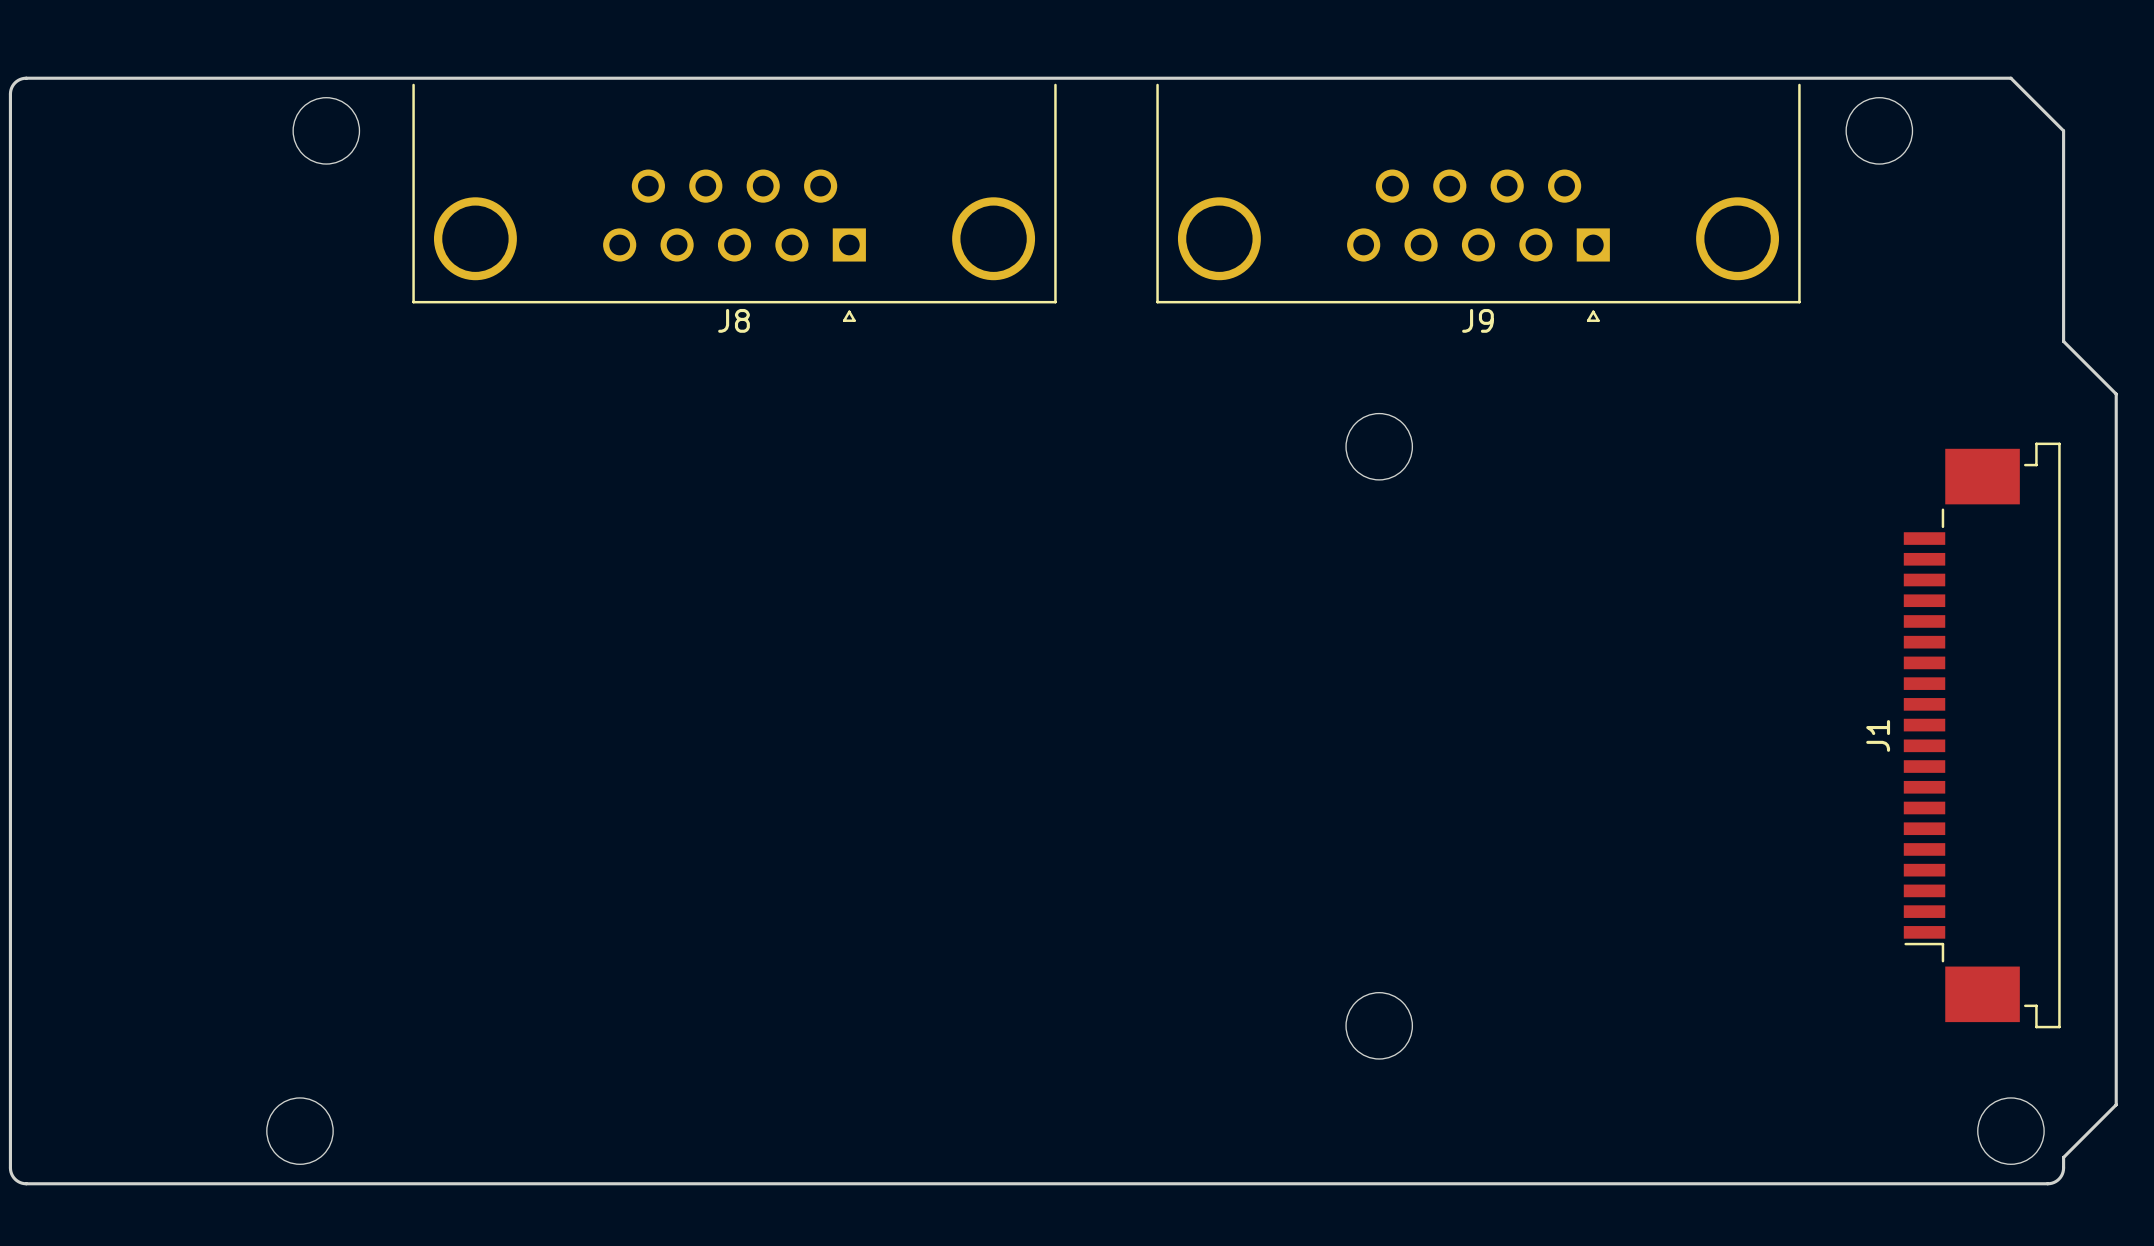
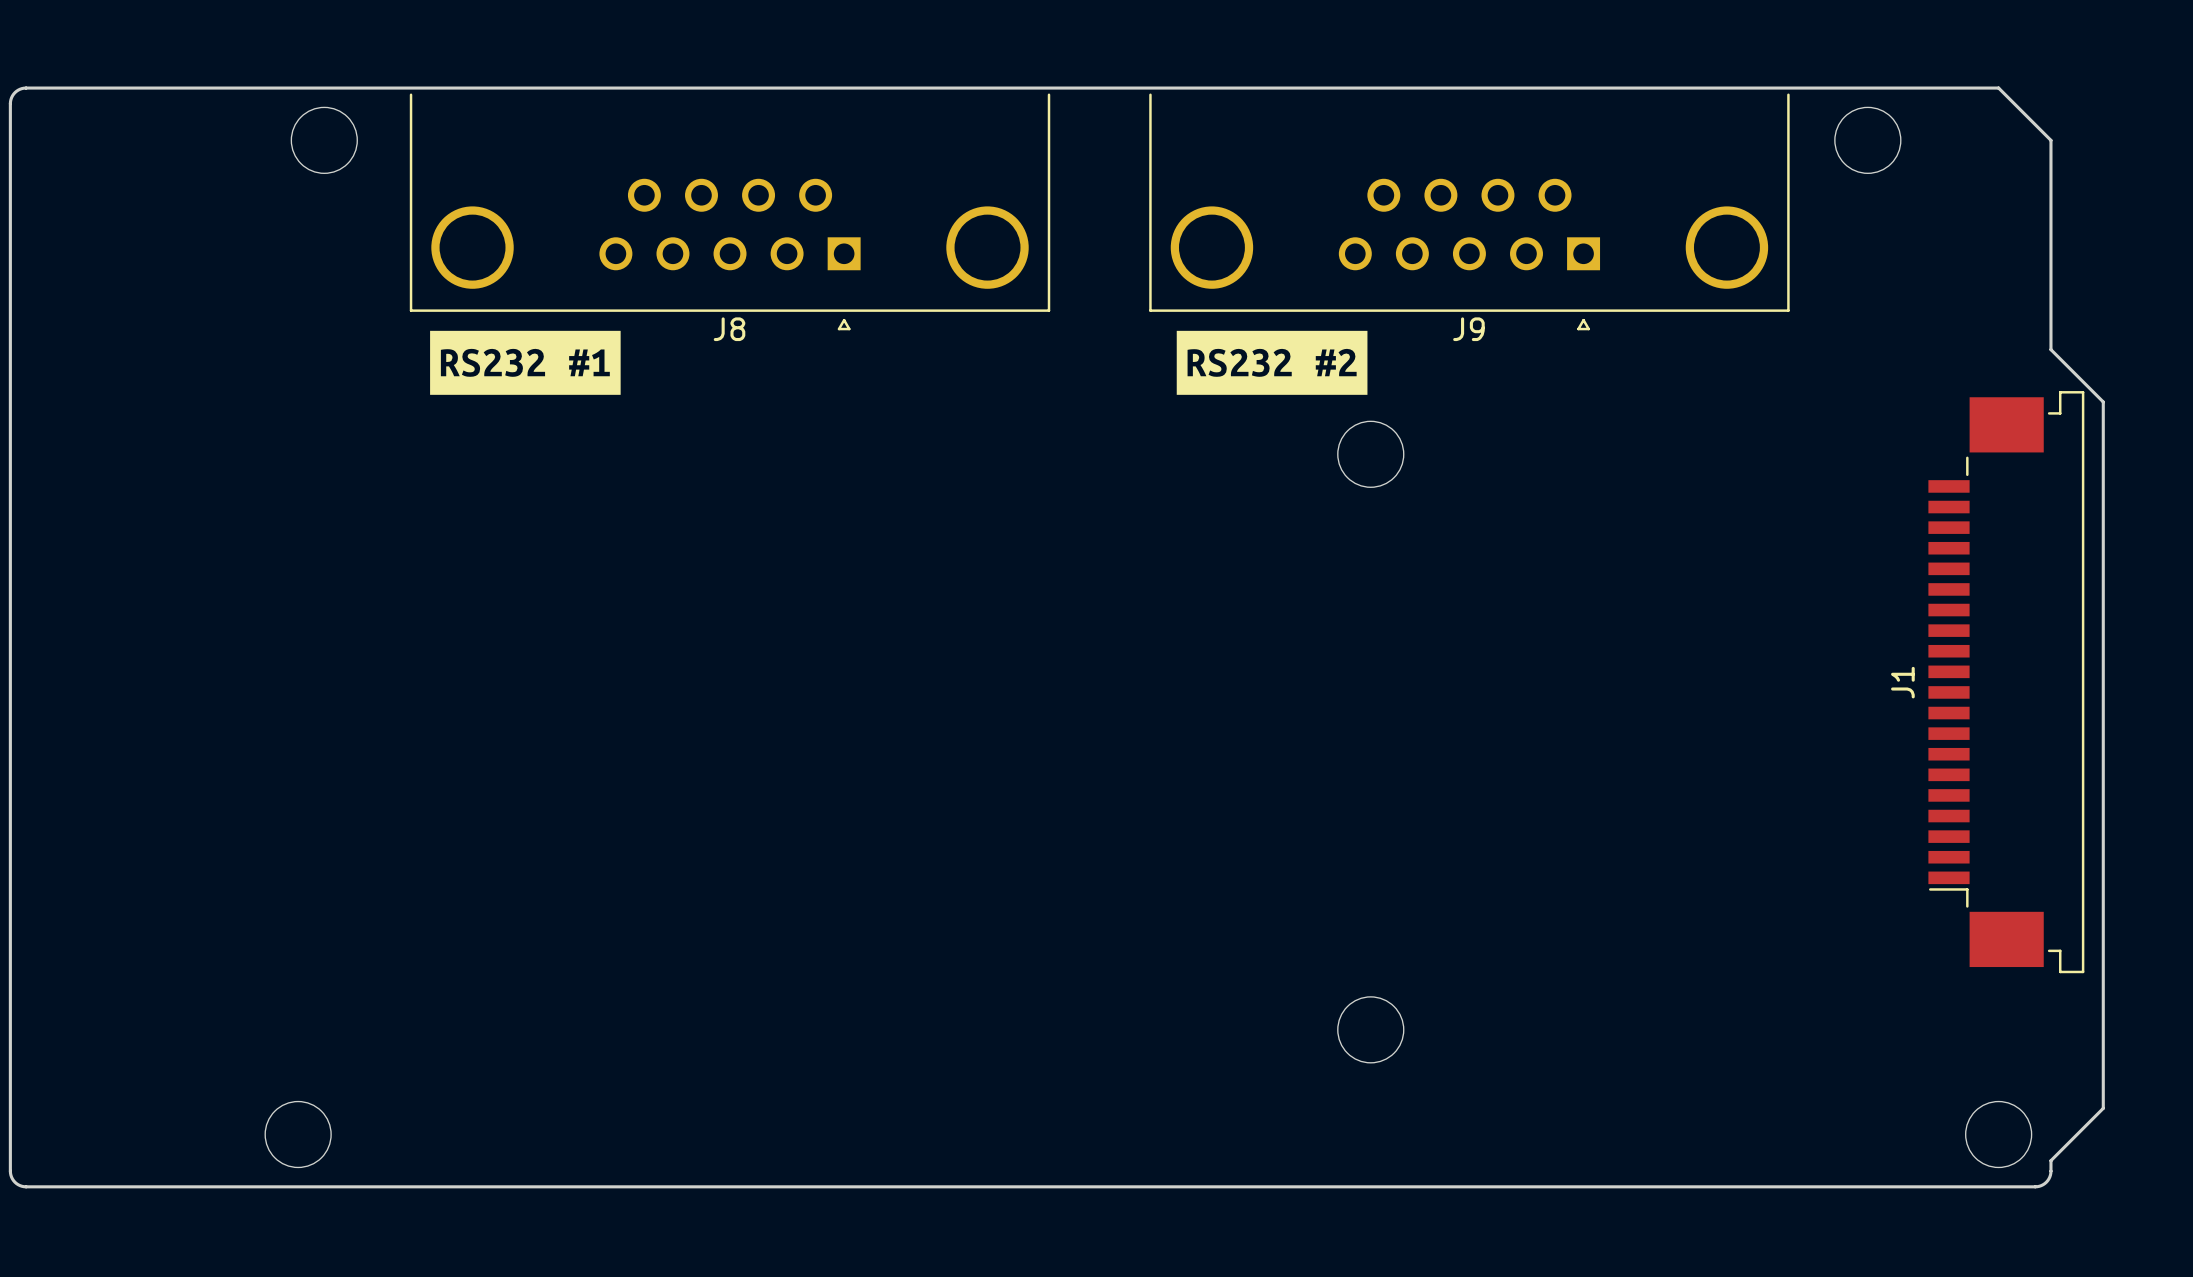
drawing: none -> [430, 330, 621, 395]
drawing: none -> [1176, 330, 1368, 395]
J1 position: (1982, 735) -> (2006, 682)

